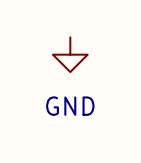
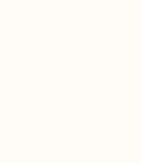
power symbol: GND (70, 54) -> none

